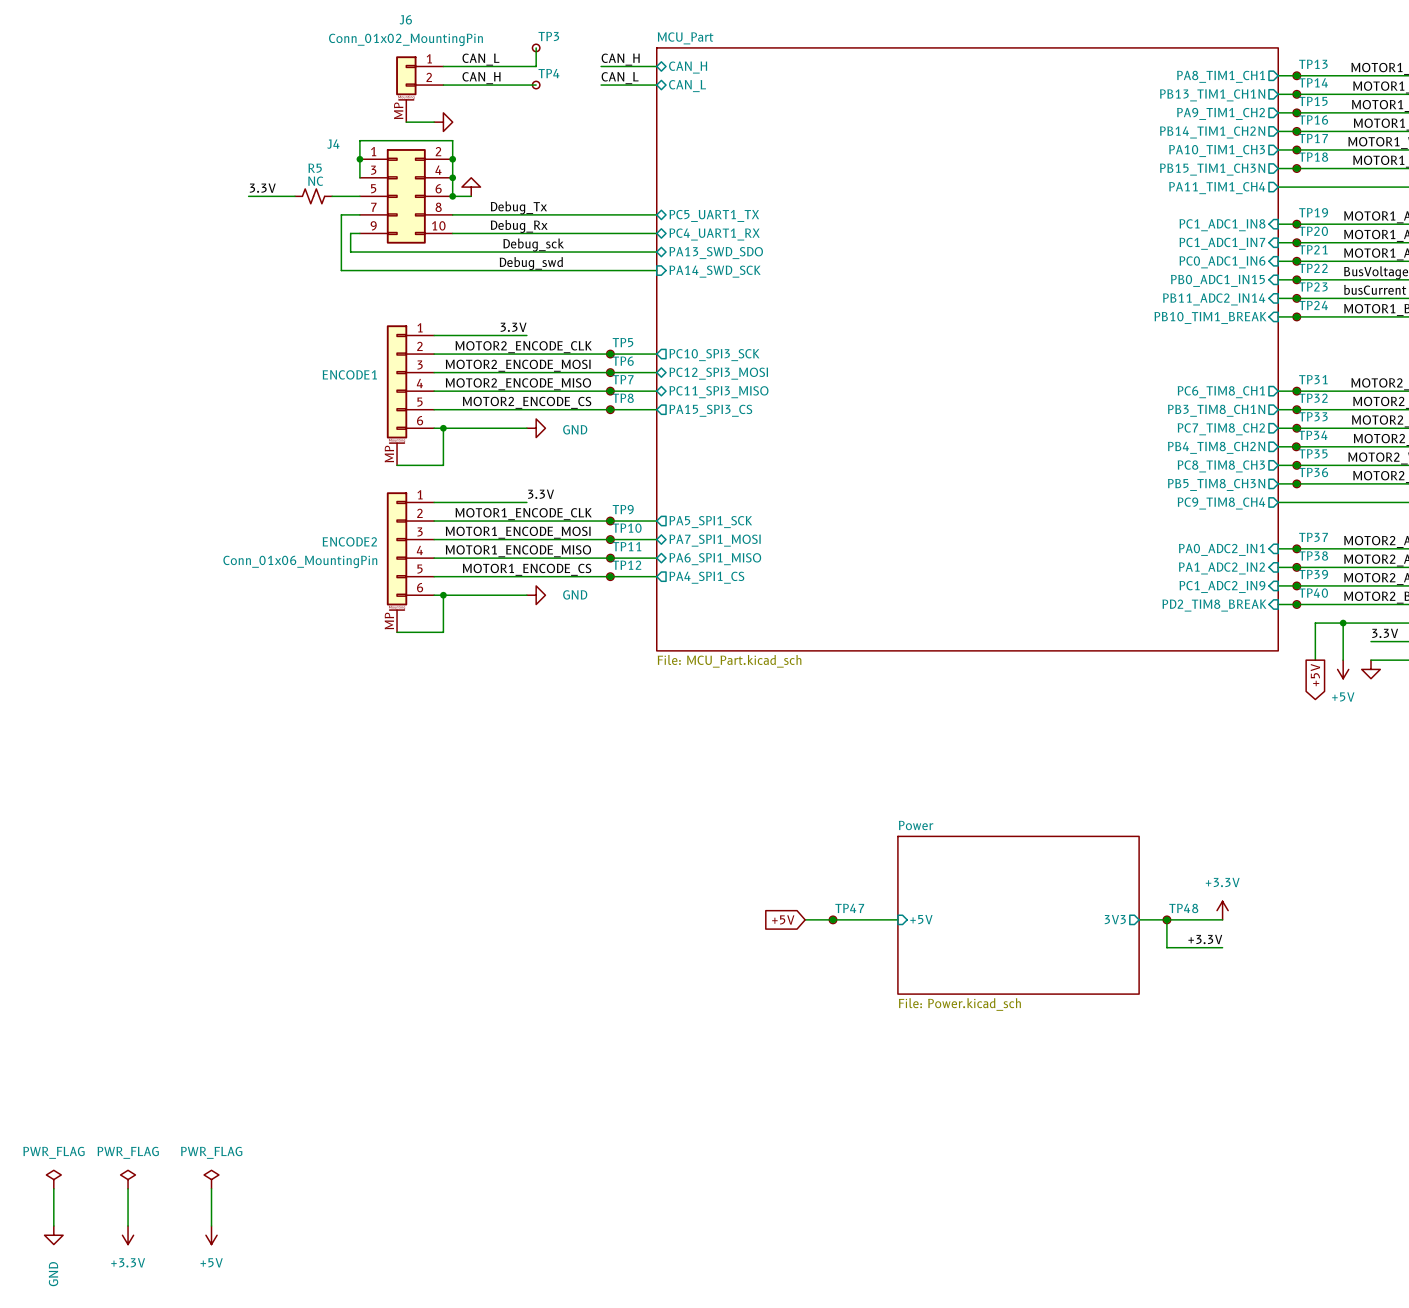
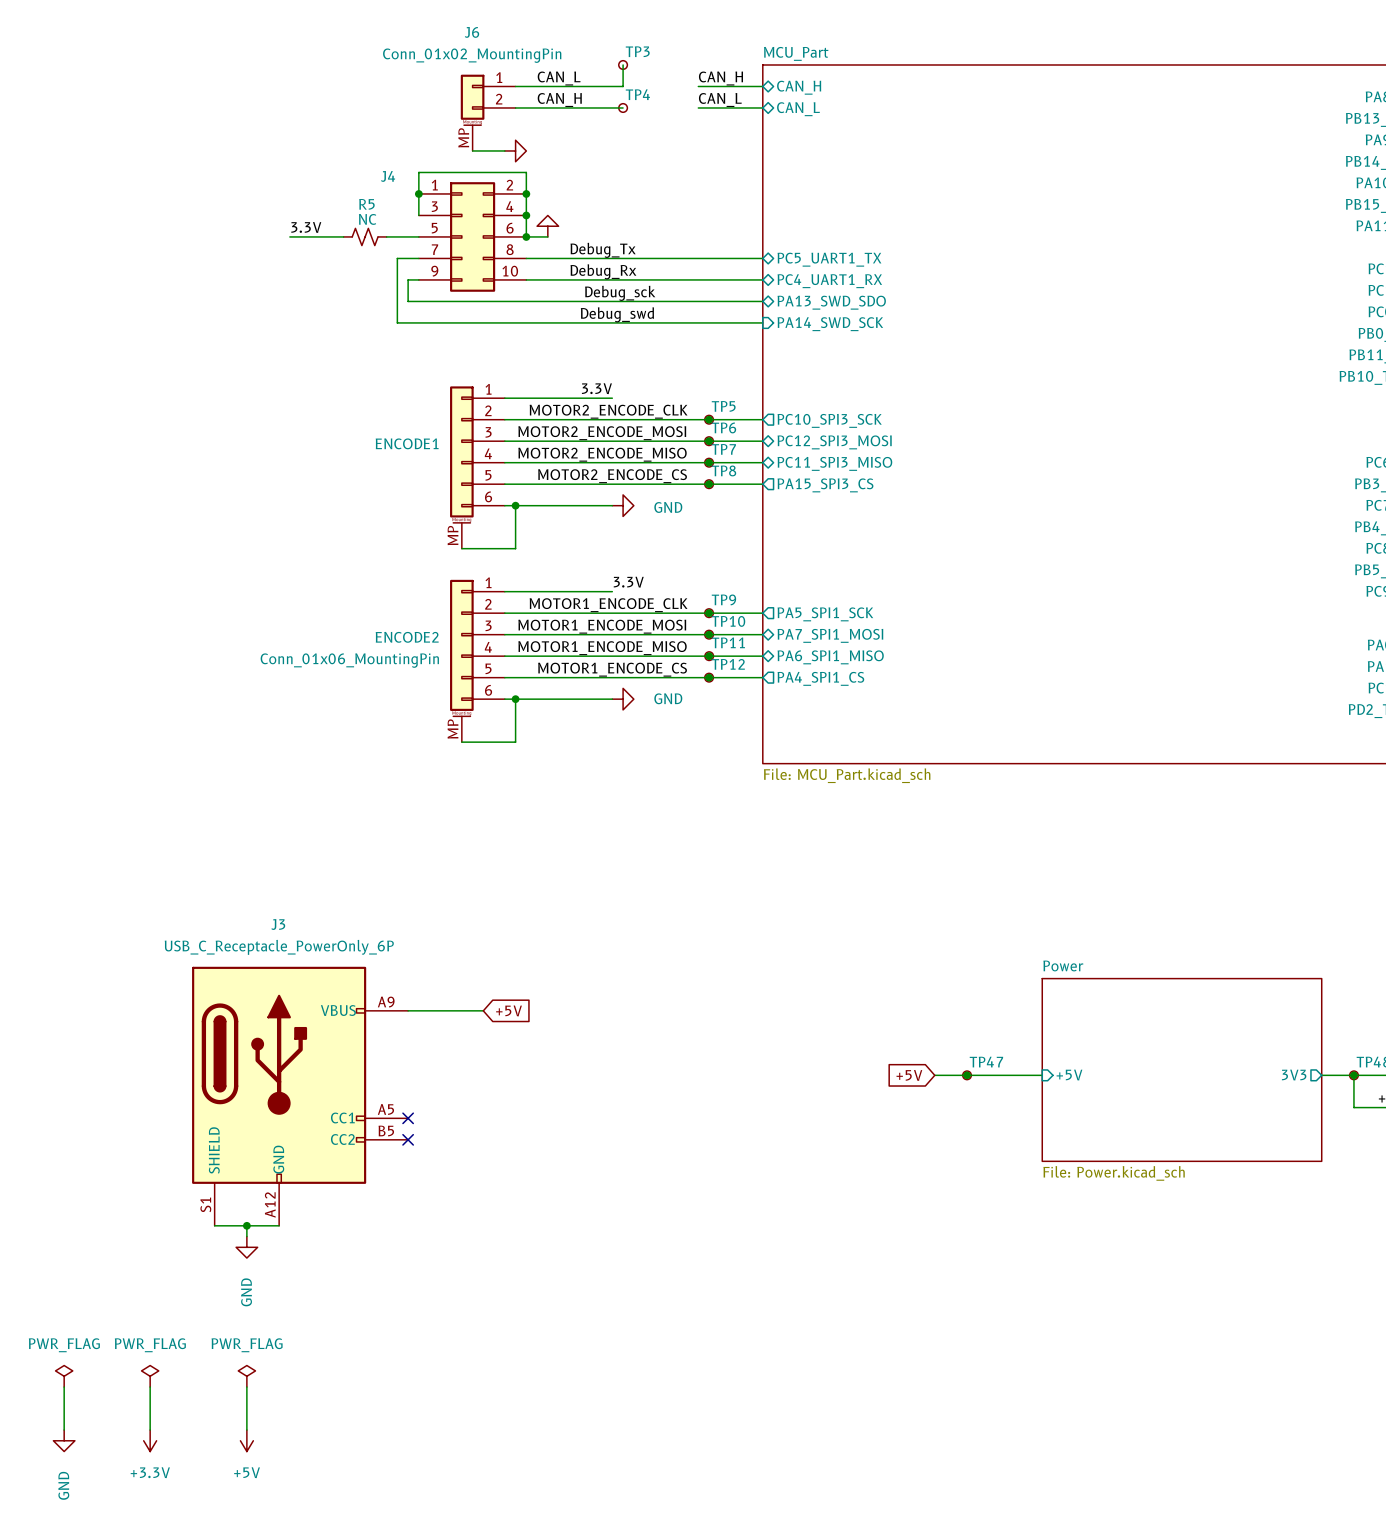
wire: none -> (408, 1010) (483, 1010)
global label: none -> +5V (509, 1010)
J3: none -> USB_C_Receptacle_PowerOnly_6P (300, 1096)
no-connect mark: none -> (408, 1118)
no-connect mark: none -> (408, 1139)
wire: none -> (214, 1225) (279, 1225)
wire: none -> (246, 1225) (246, 1236)
junction: none -> (246, 1225)
power symbol: none -> GND (246, 1247)

